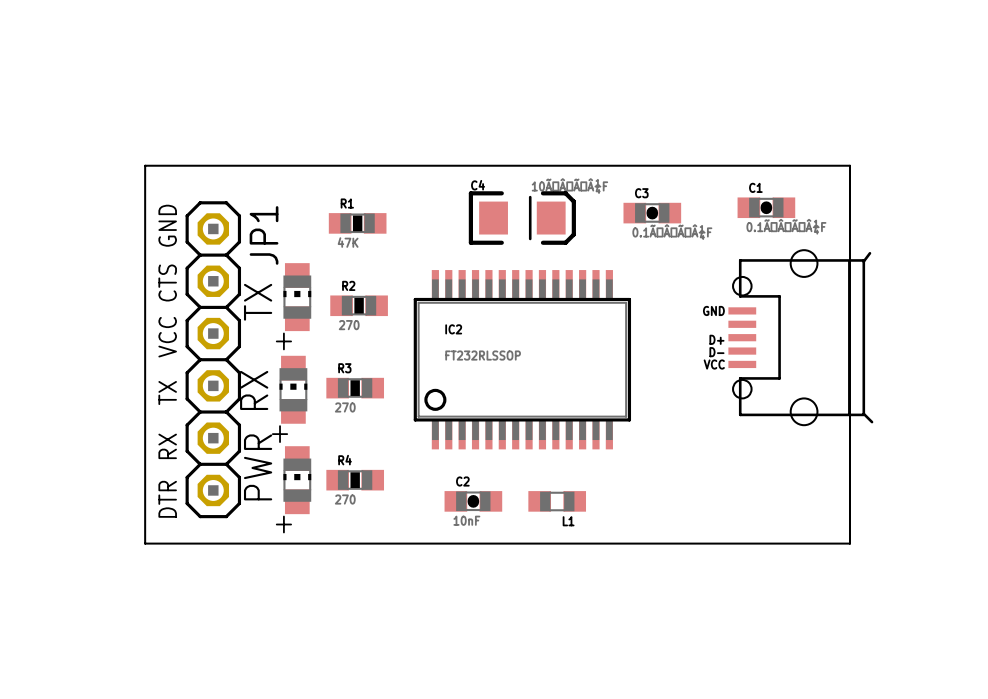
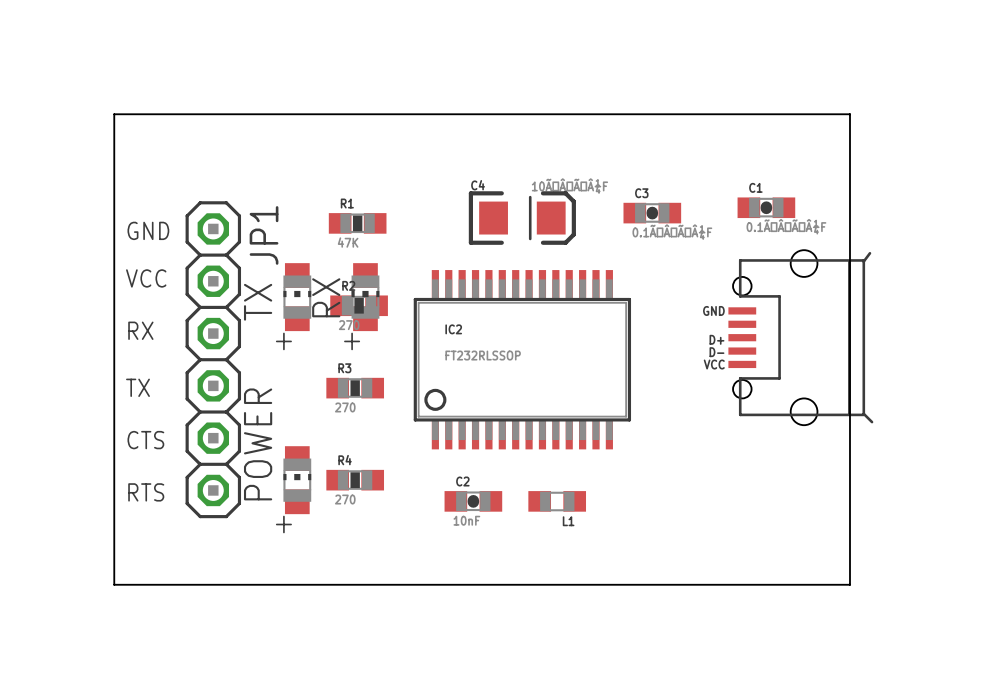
board edge: (849, 165) (145, 165) (145, 543) (849, 543) -> (849, 165) (849, 114) (114, 114) (114, 584) (849, 584) (849, 543)
text rotation: 0° (167, 225) -> 90° clockwise (148, 230)
text rotation: 0° (167, 282) -> 90° clockwise (145, 440)
text position: CTS (167, 282) -> CTS (145, 440)
text rotation: 0° (167, 337) -> 90° clockwise (146, 278)
text position: VCC (167, 337) -> VCC (146, 278)
RX position: (293, 389) -> (365, 297)
text rotation: 0° (167, 393) -> 90° clockwise (137, 387)
text rotation: 0° (167, 446) -> 90° clockwise (140, 330)
text position: RX (167, 446) -> RX (140, 330)
PWR name: PWR (258, 467) -> POWER (258, 444)
text: none -> RTS (146, 492)
text: DTR (167, 499) -> none

